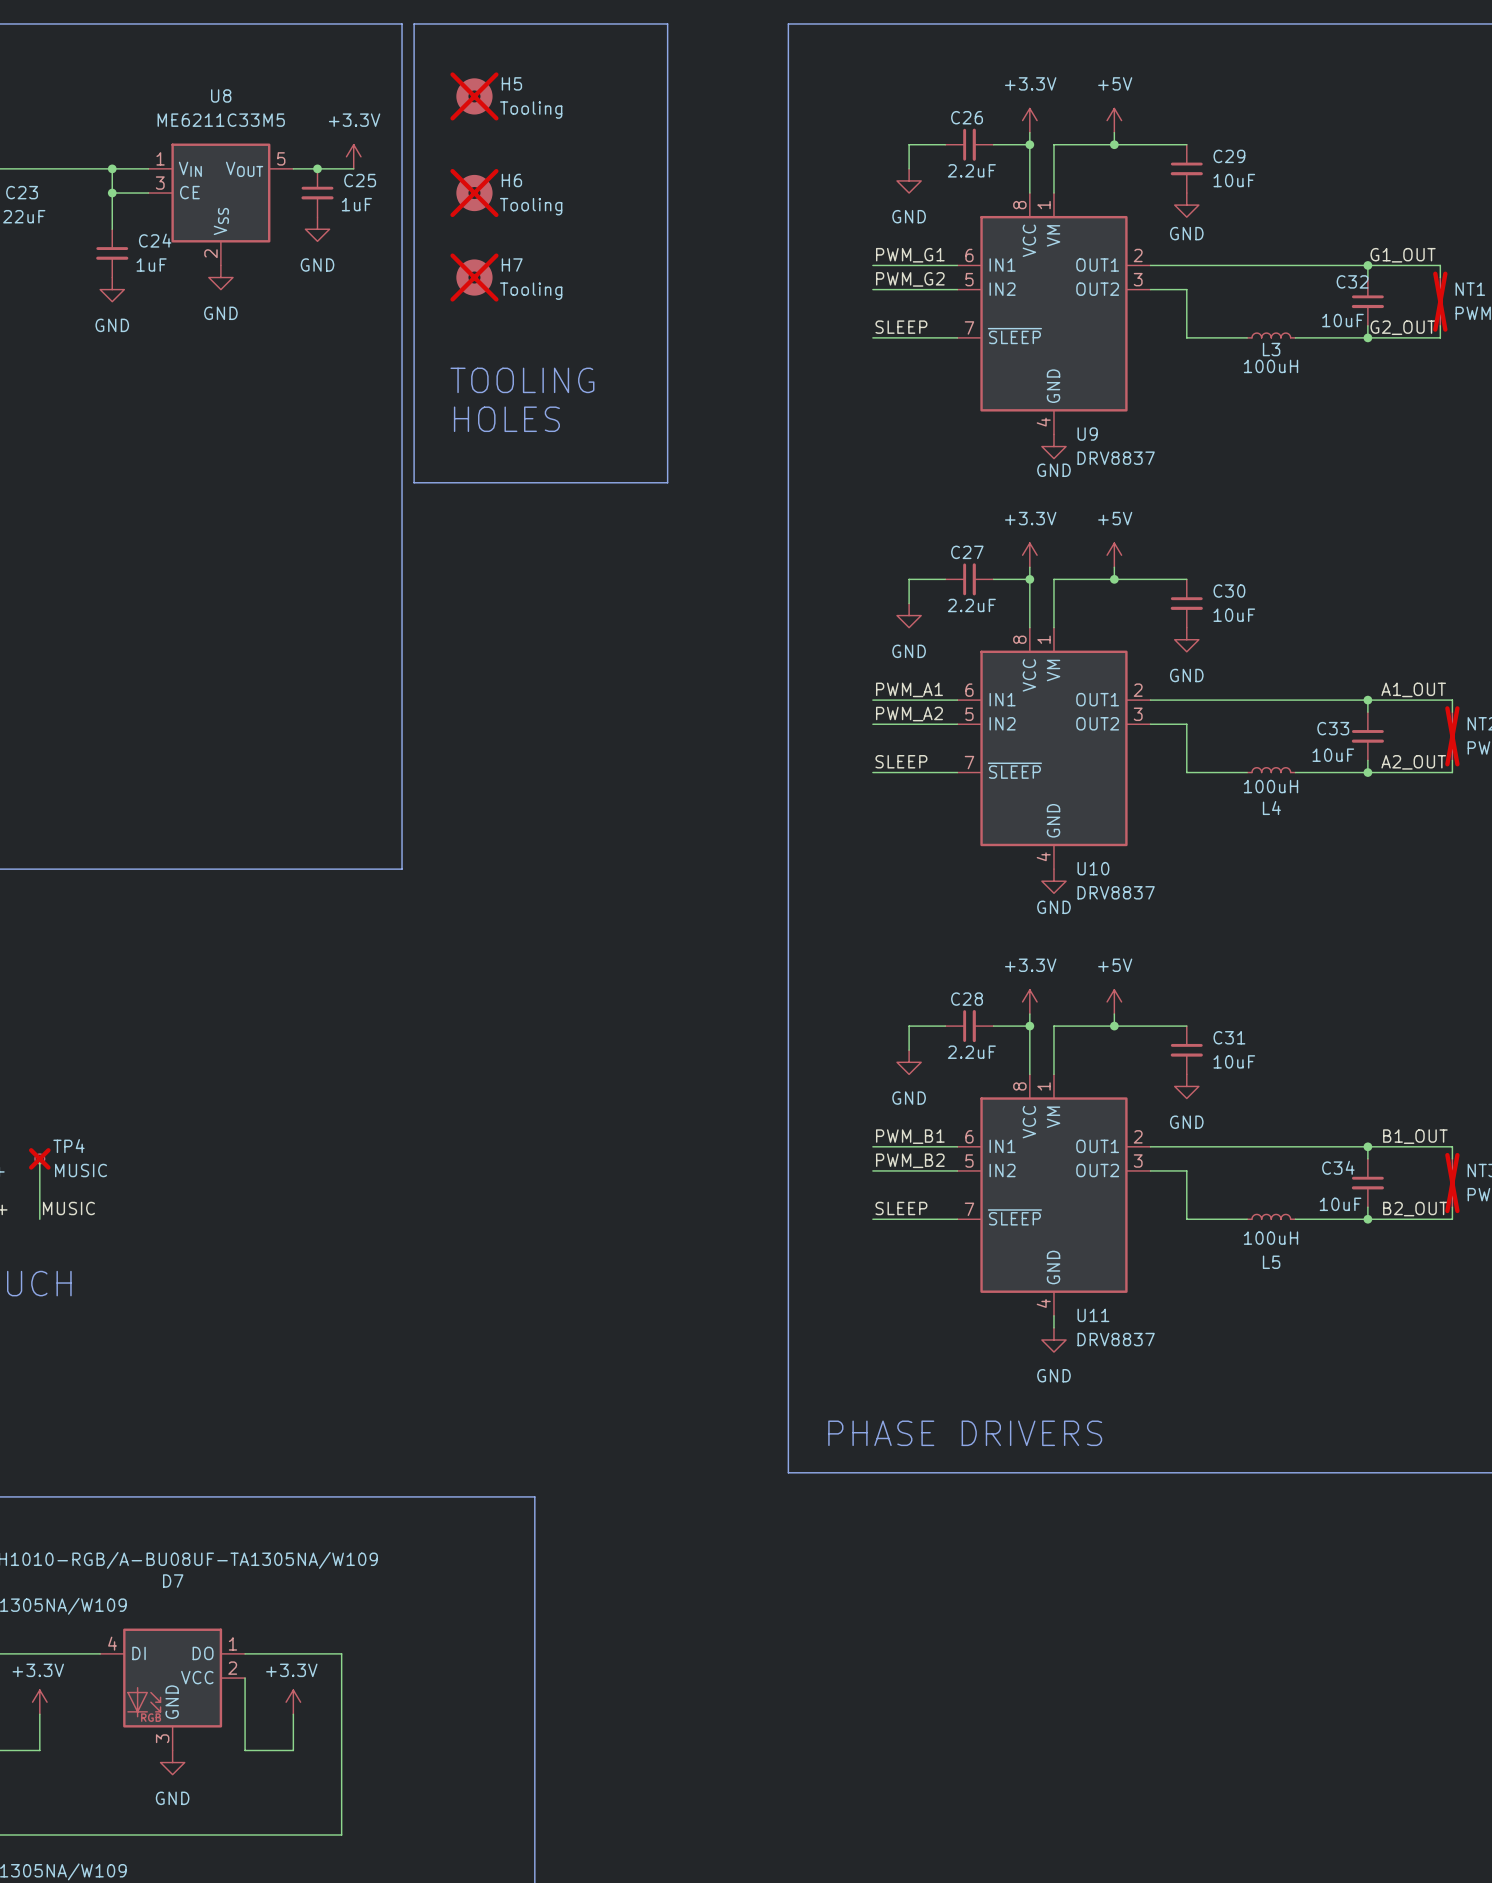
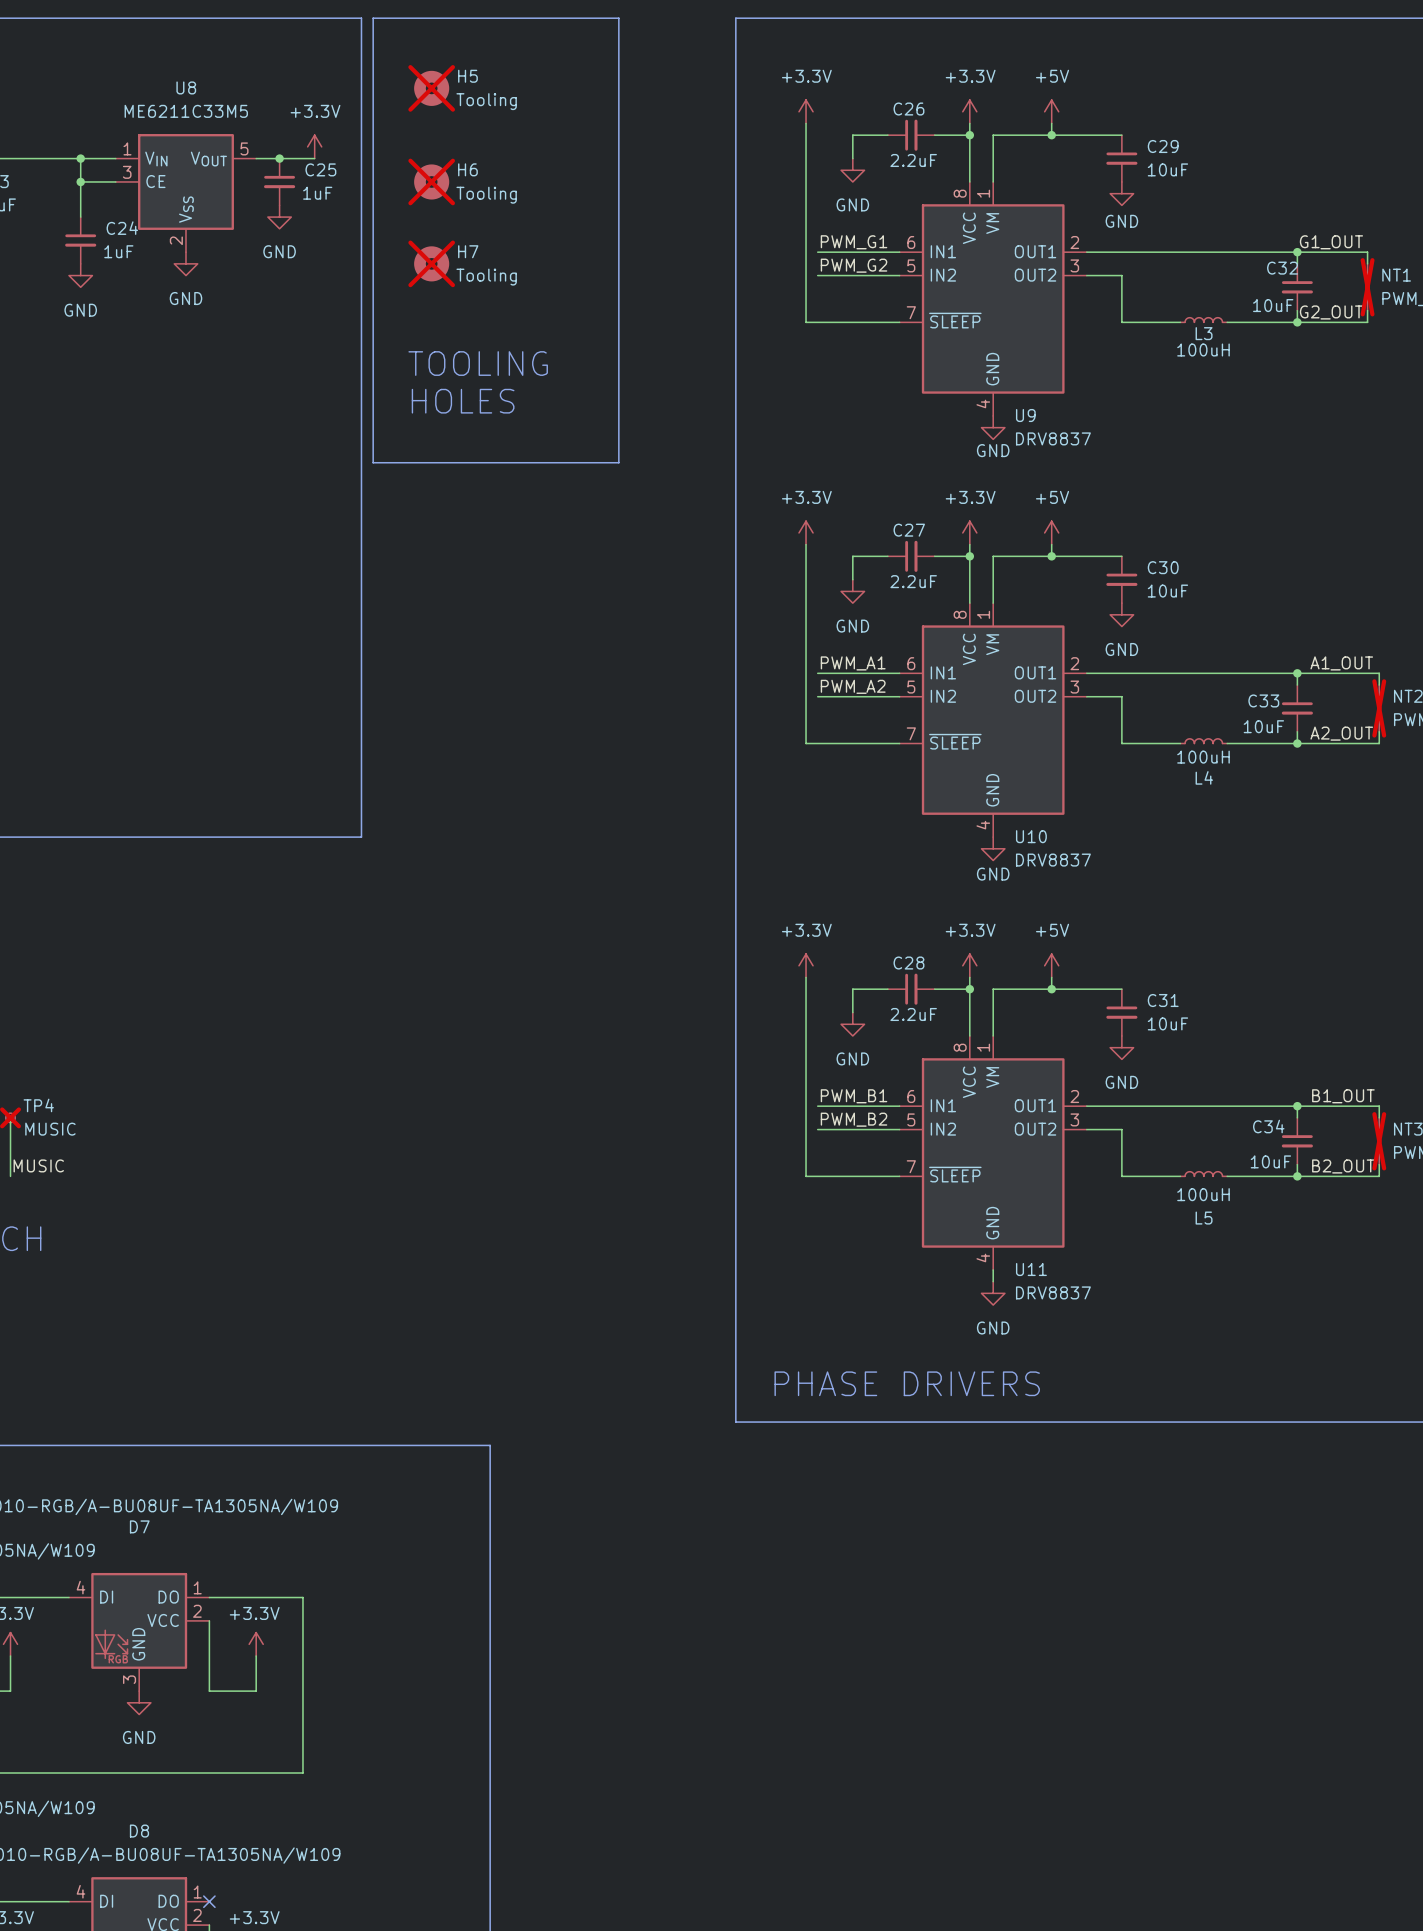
power symbol: none -> +3.3V (806, 111)
wire: none -> (806, 123) (806, 322) (817, 322)
label: SLEEP (901, 327) -> none
power symbol: none -> +3.3V (806, 532)
wire: none -> (806, 544) (806, 743) (817, 743)
label: SLEEP (901, 761) -> none
power symbol: none -> +3.3V (806, 965)
wire: none -> (806, 977) (806, 1176) (817, 1176)
label: SLEEP (901, 1208) -> none

